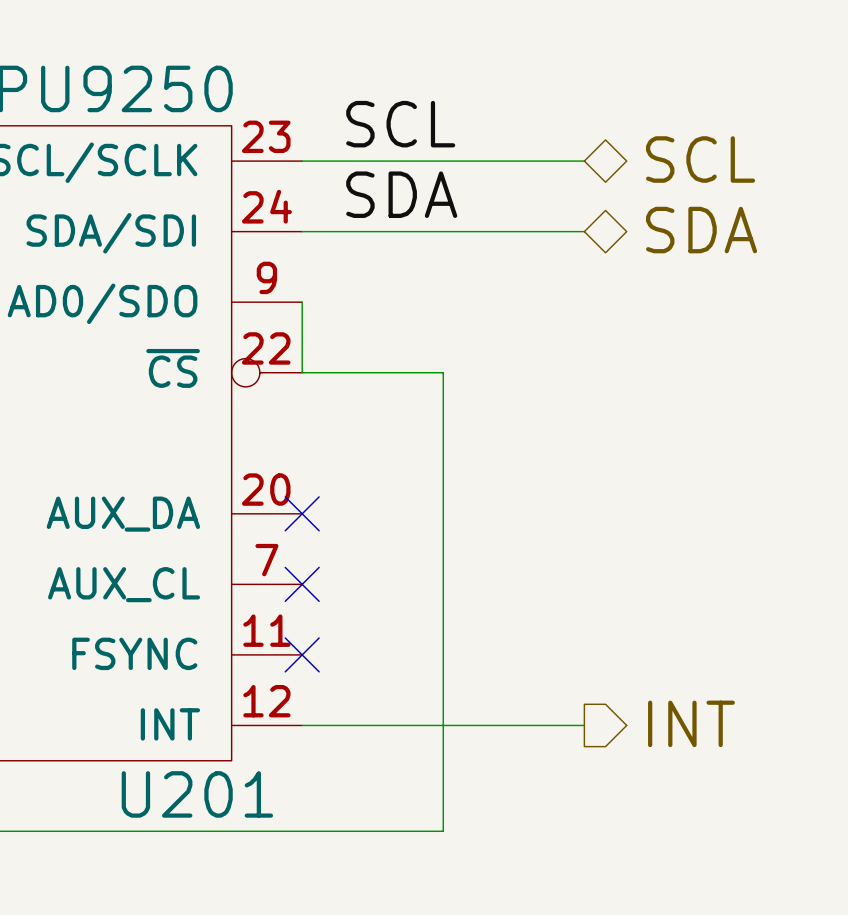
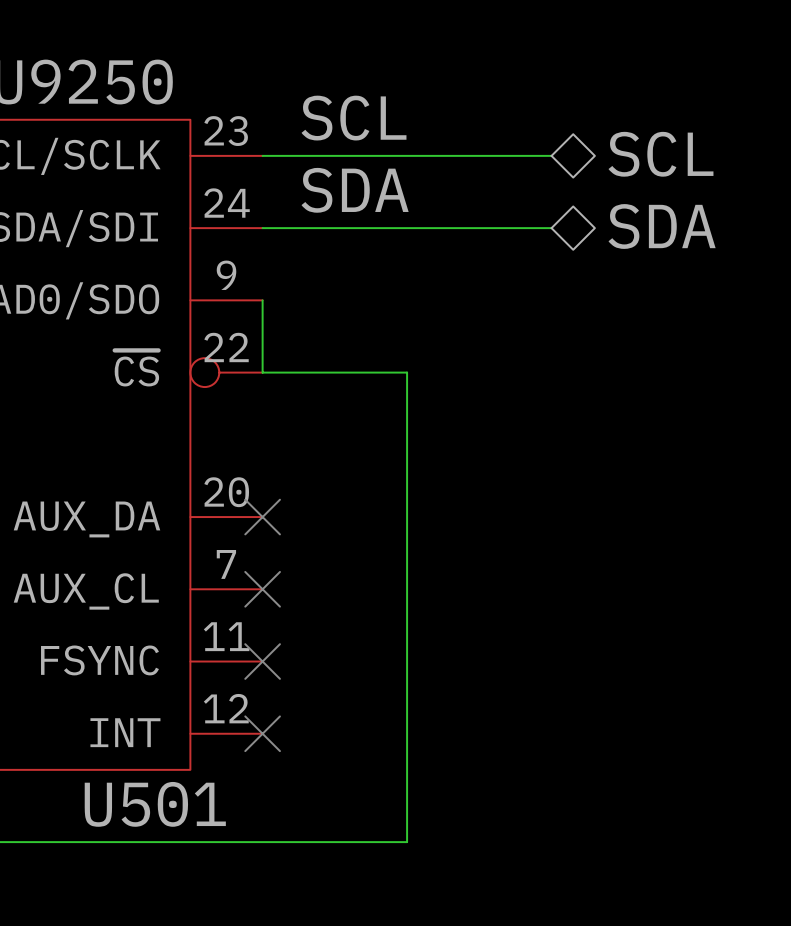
hierarchical label: INT (691, 723) -> none
wire: (302, 725) (584, 725) -> none
no-connect mark: none -> (262, 733)
U201 name: U201 (197, 794) -> U501 (155, 804)

